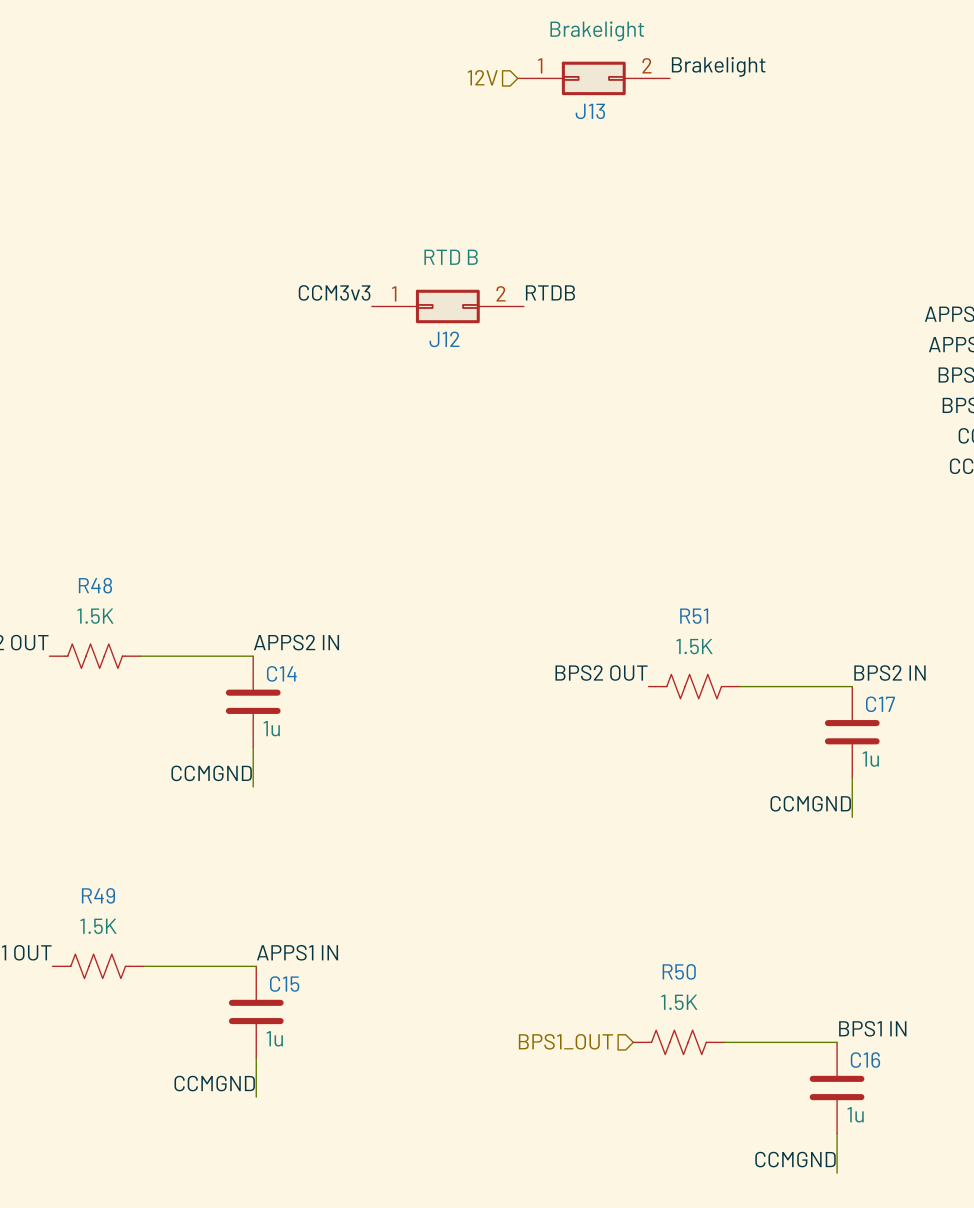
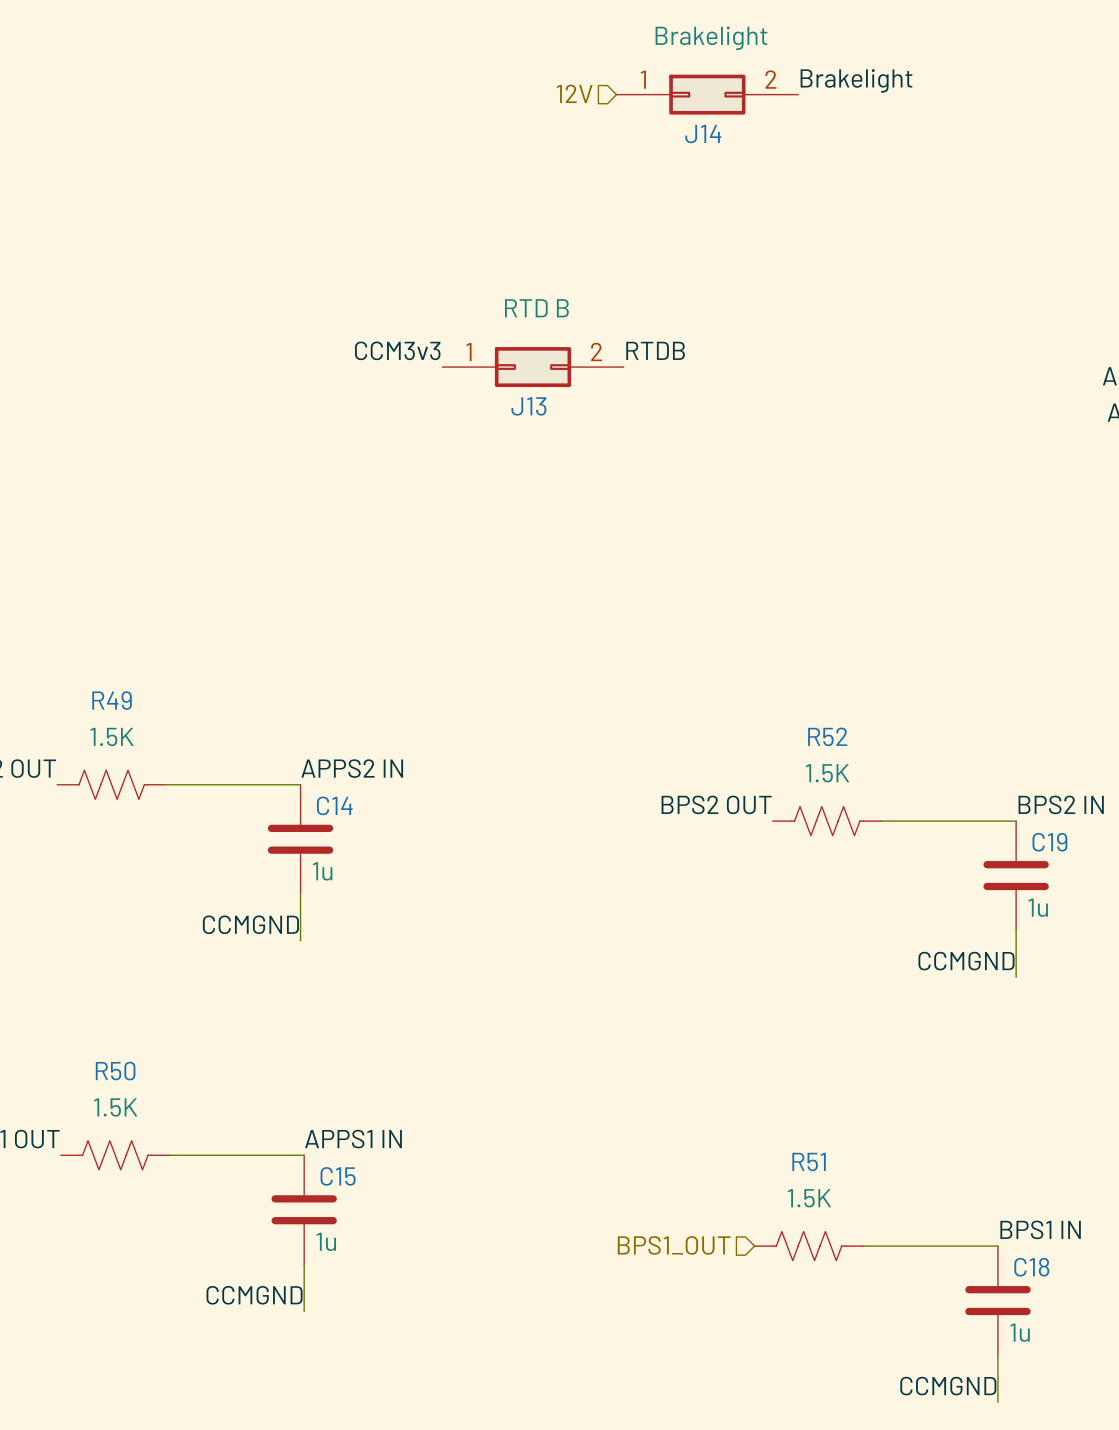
J13 name: J13 (590, 111) -> J14 (703, 134)
J12 name: J12 (444, 339) -> J13 (528, 406)
R48 name: R48 (95, 585) -> R49 (112, 700)
R51 name: R51 (694, 616) -> R52 (827, 736)
C17 name: C17 (880, 704) -> C19 (1049, 842)
R49 name: R49 (98, 895) -> R50 (115, 1071)
R50 name: R50 (679, 971) -> R51 (809, 1161)
C16 name: C16 (865, 1060) -> C18 (1031, 1267)

